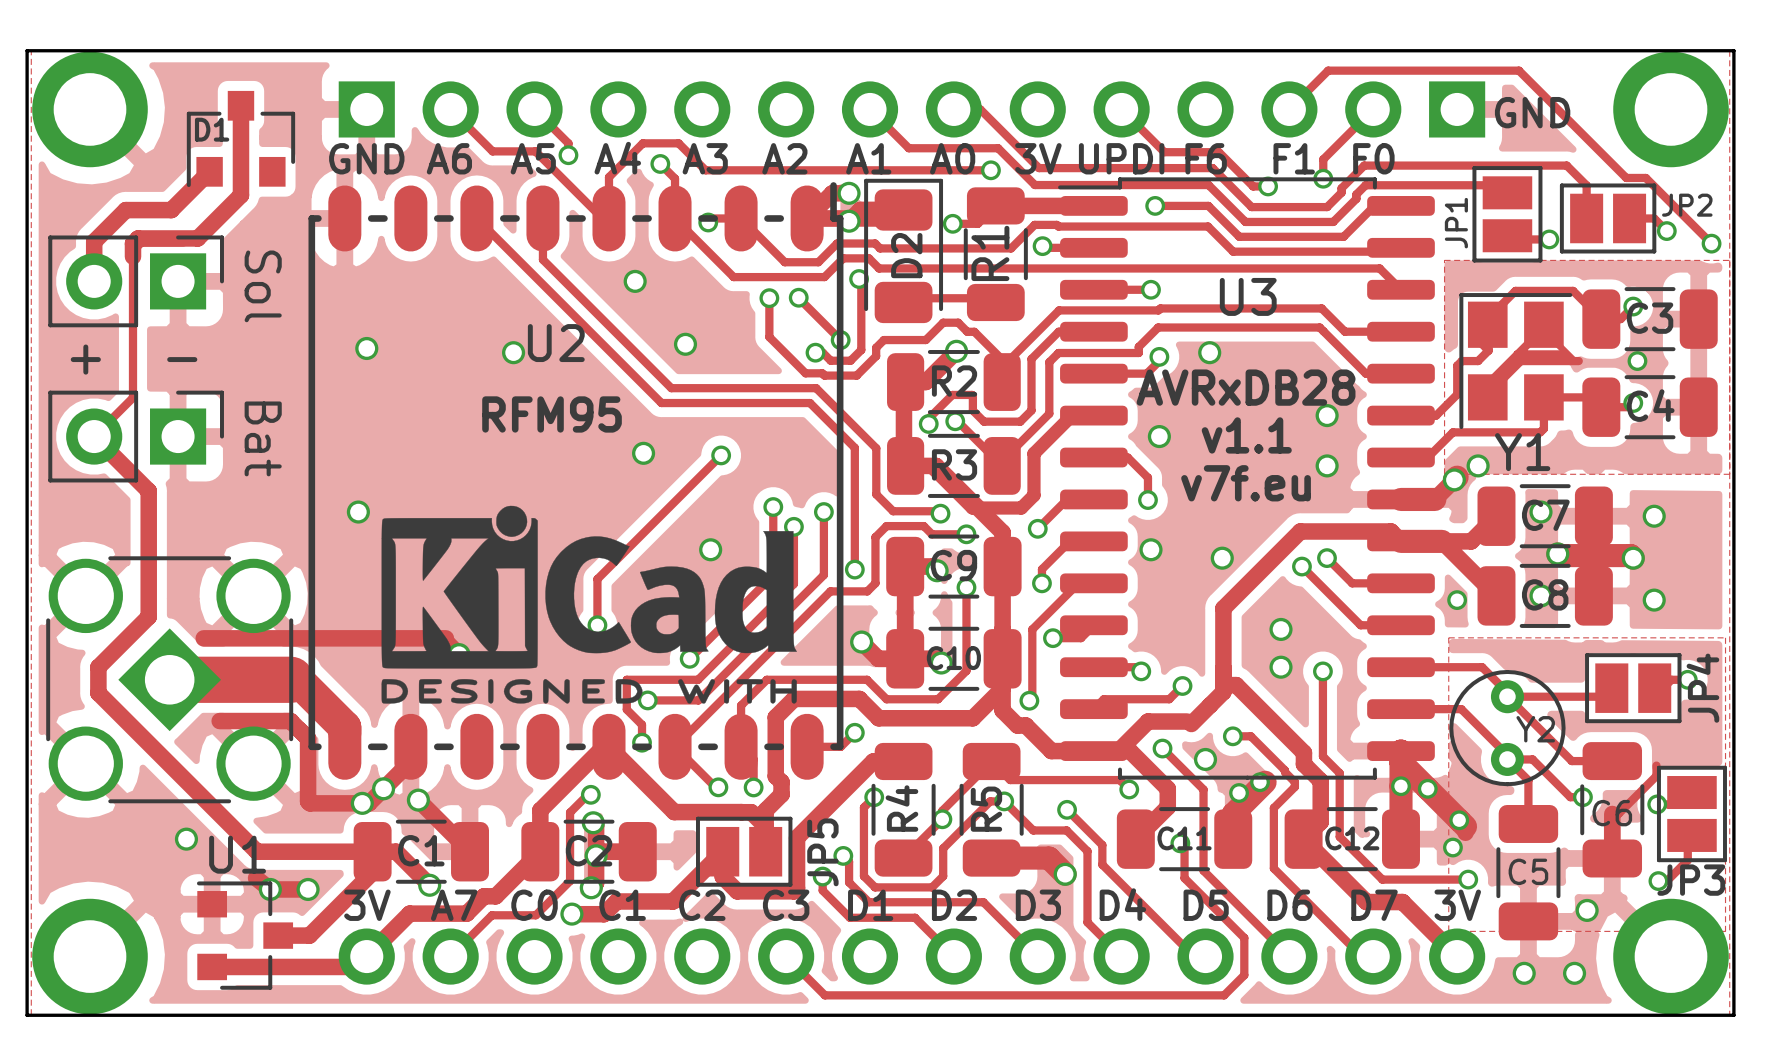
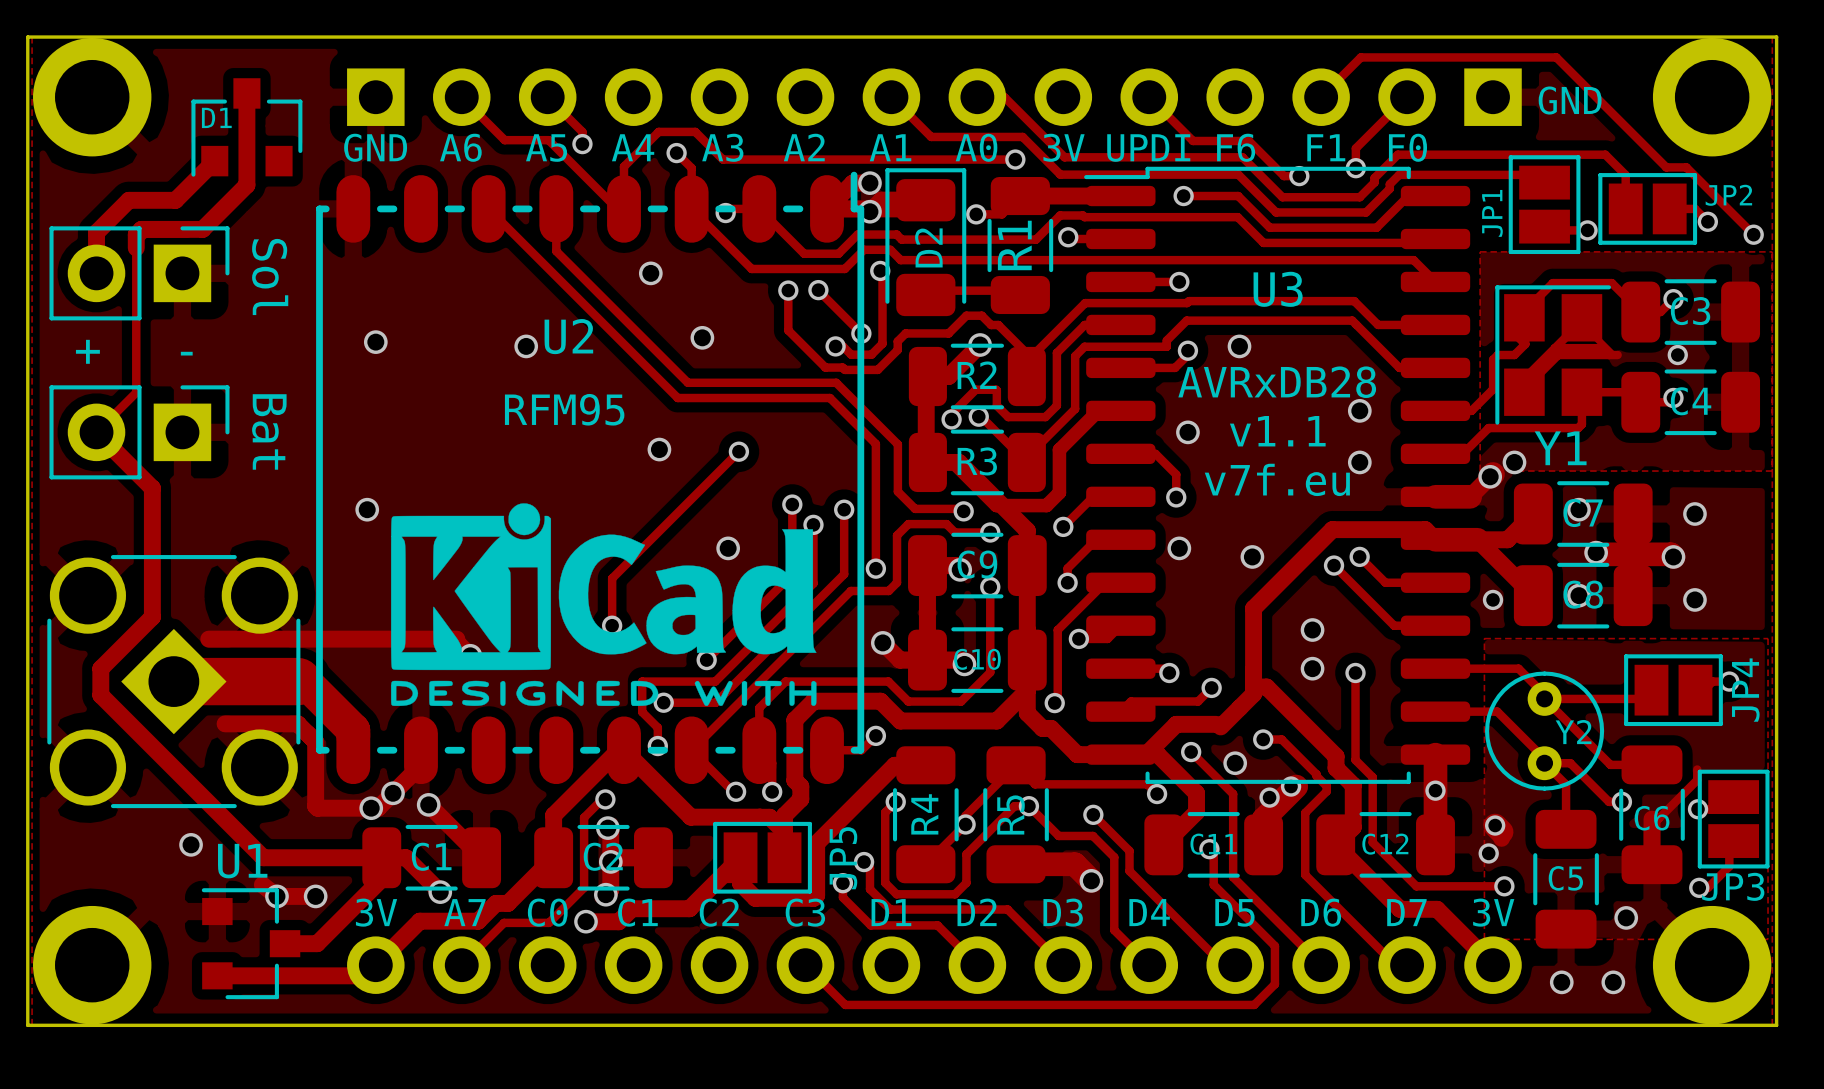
track: (1400, 762) (1459, 820) -> none
via: (1427, 788) -> none

